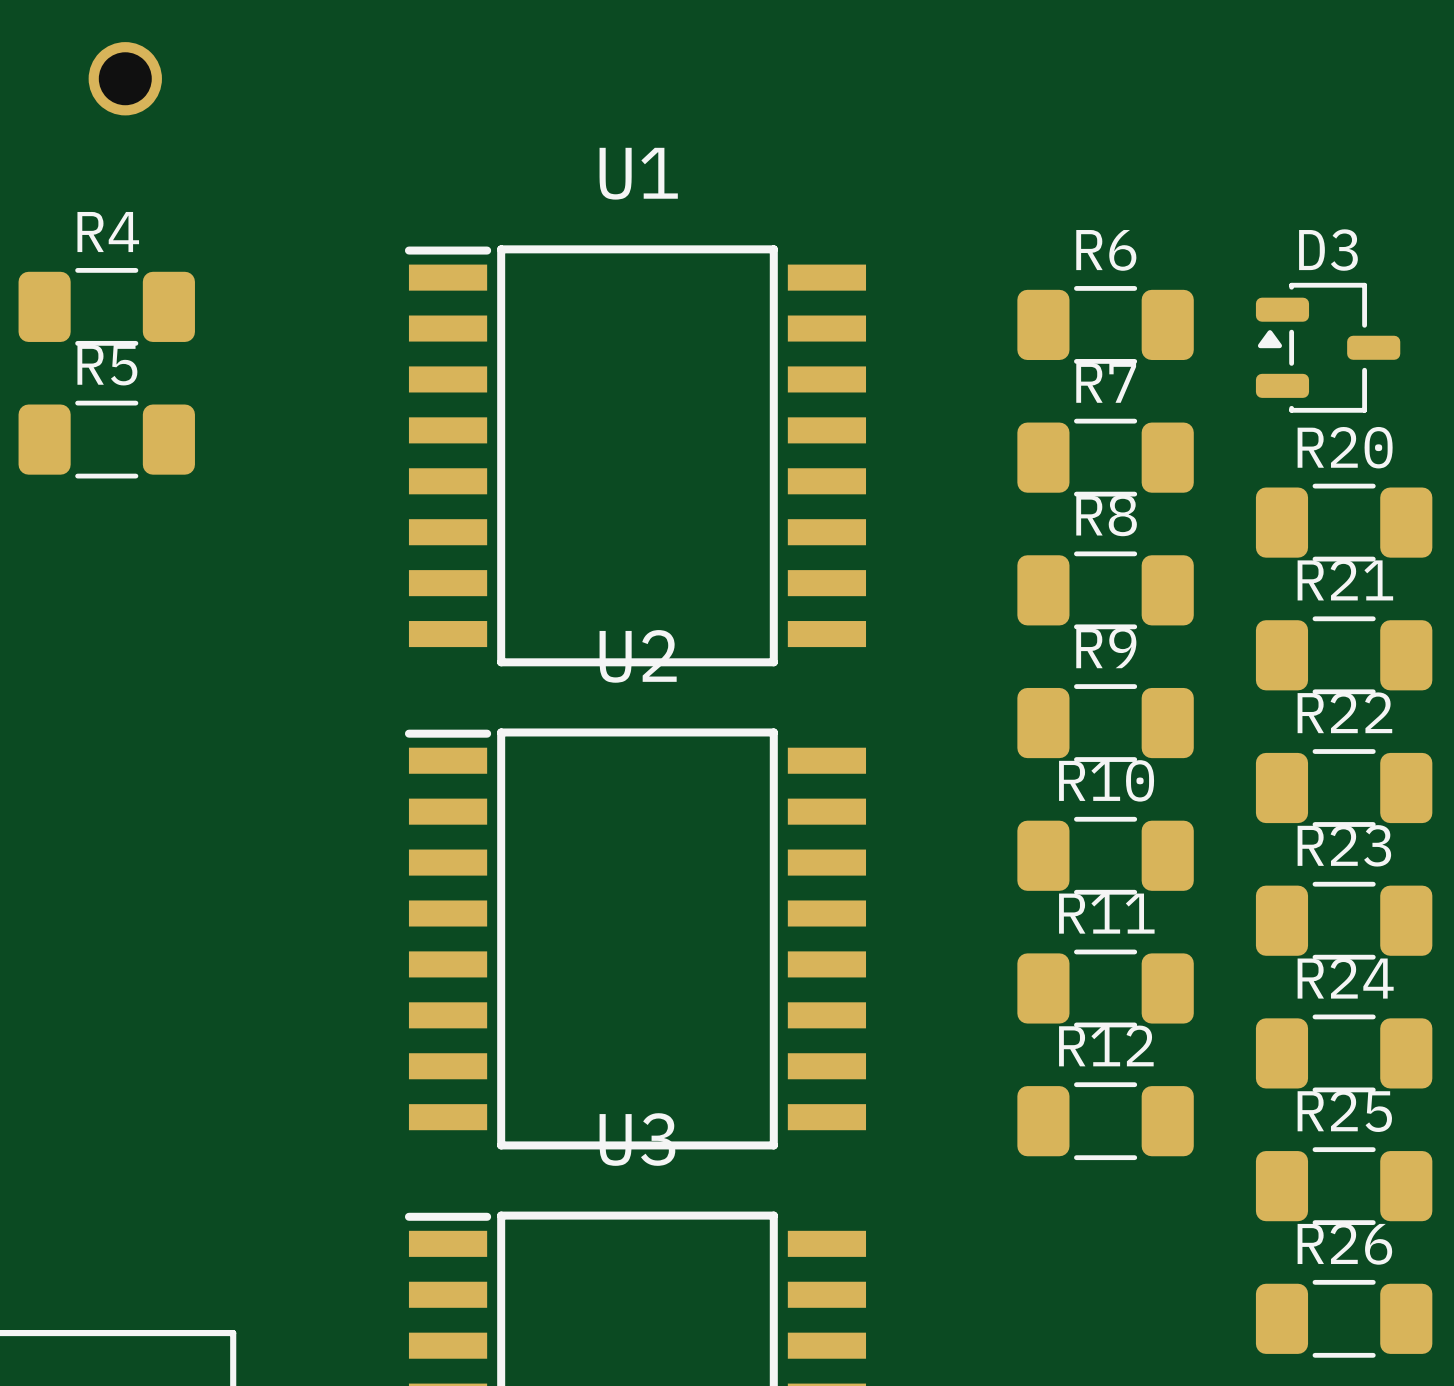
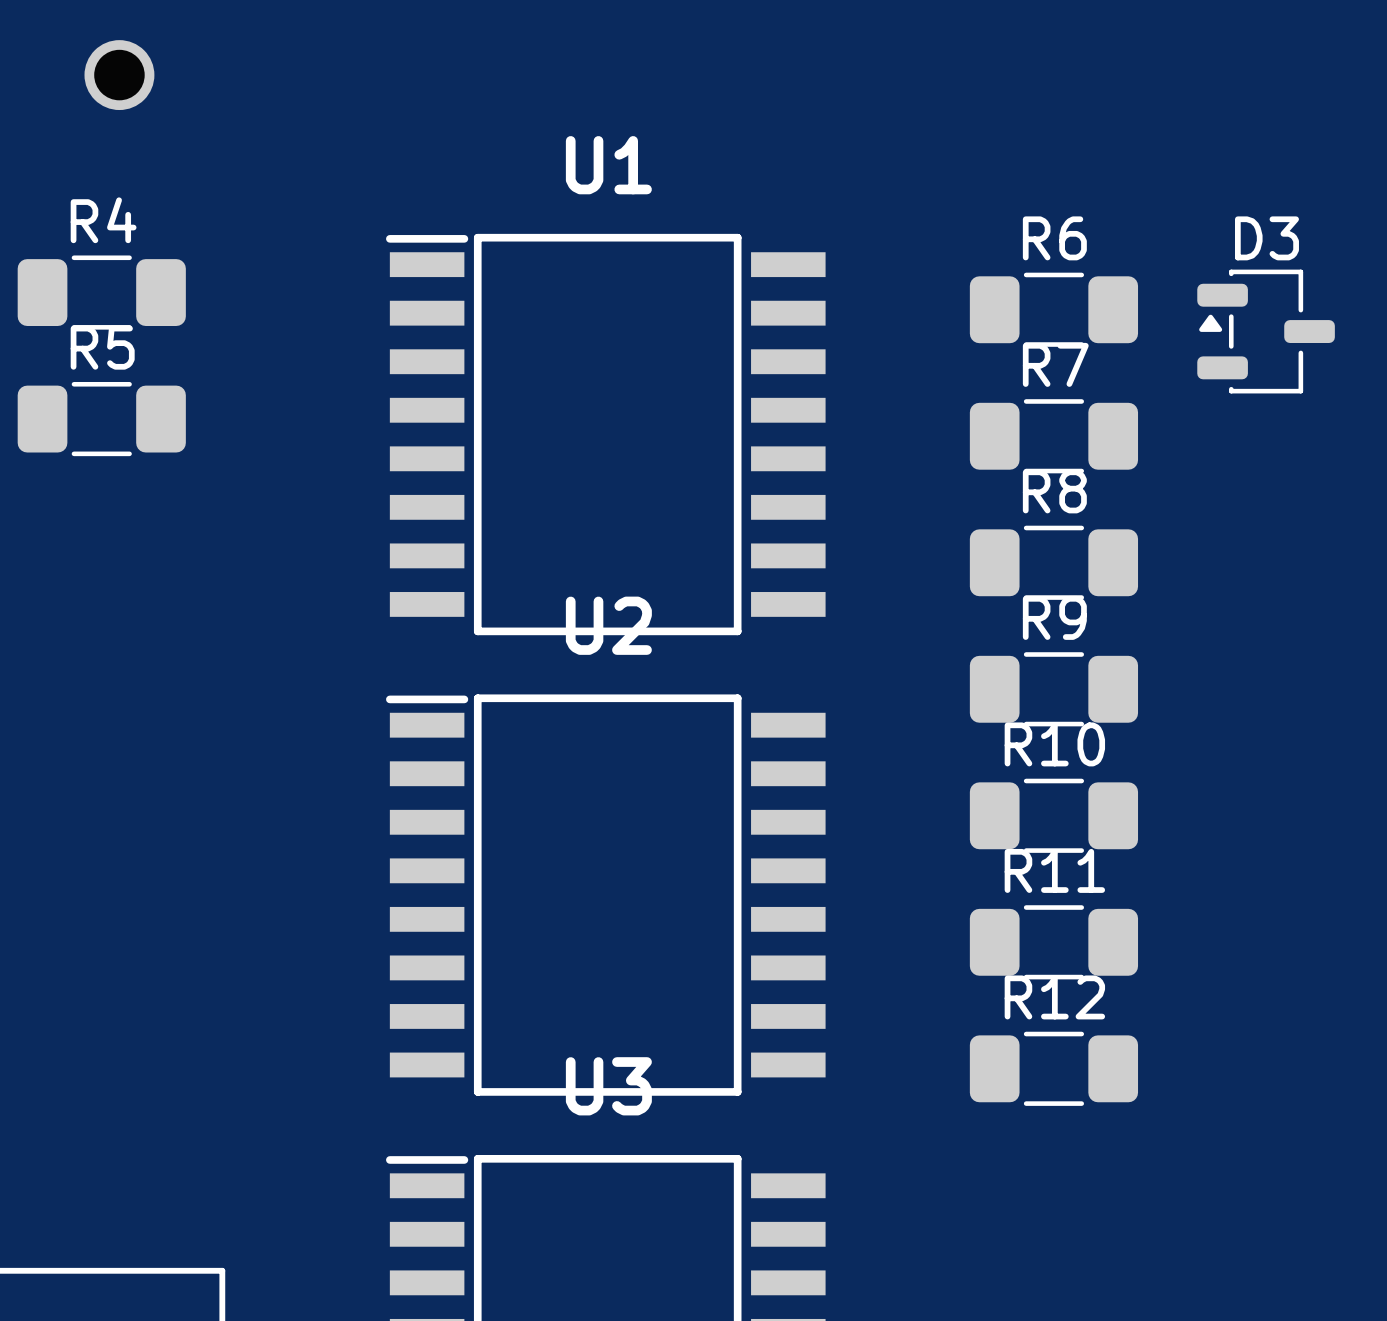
R20: (1344, 522) -> none
R21: (1344, 655) -> none
R22: (1344, 788) -> none
R23: (1344, 920) -> none
R24: (1344, 1053) -> none
R25: (1344, 1186) -> none
R26: (1344, 1318) -> none

